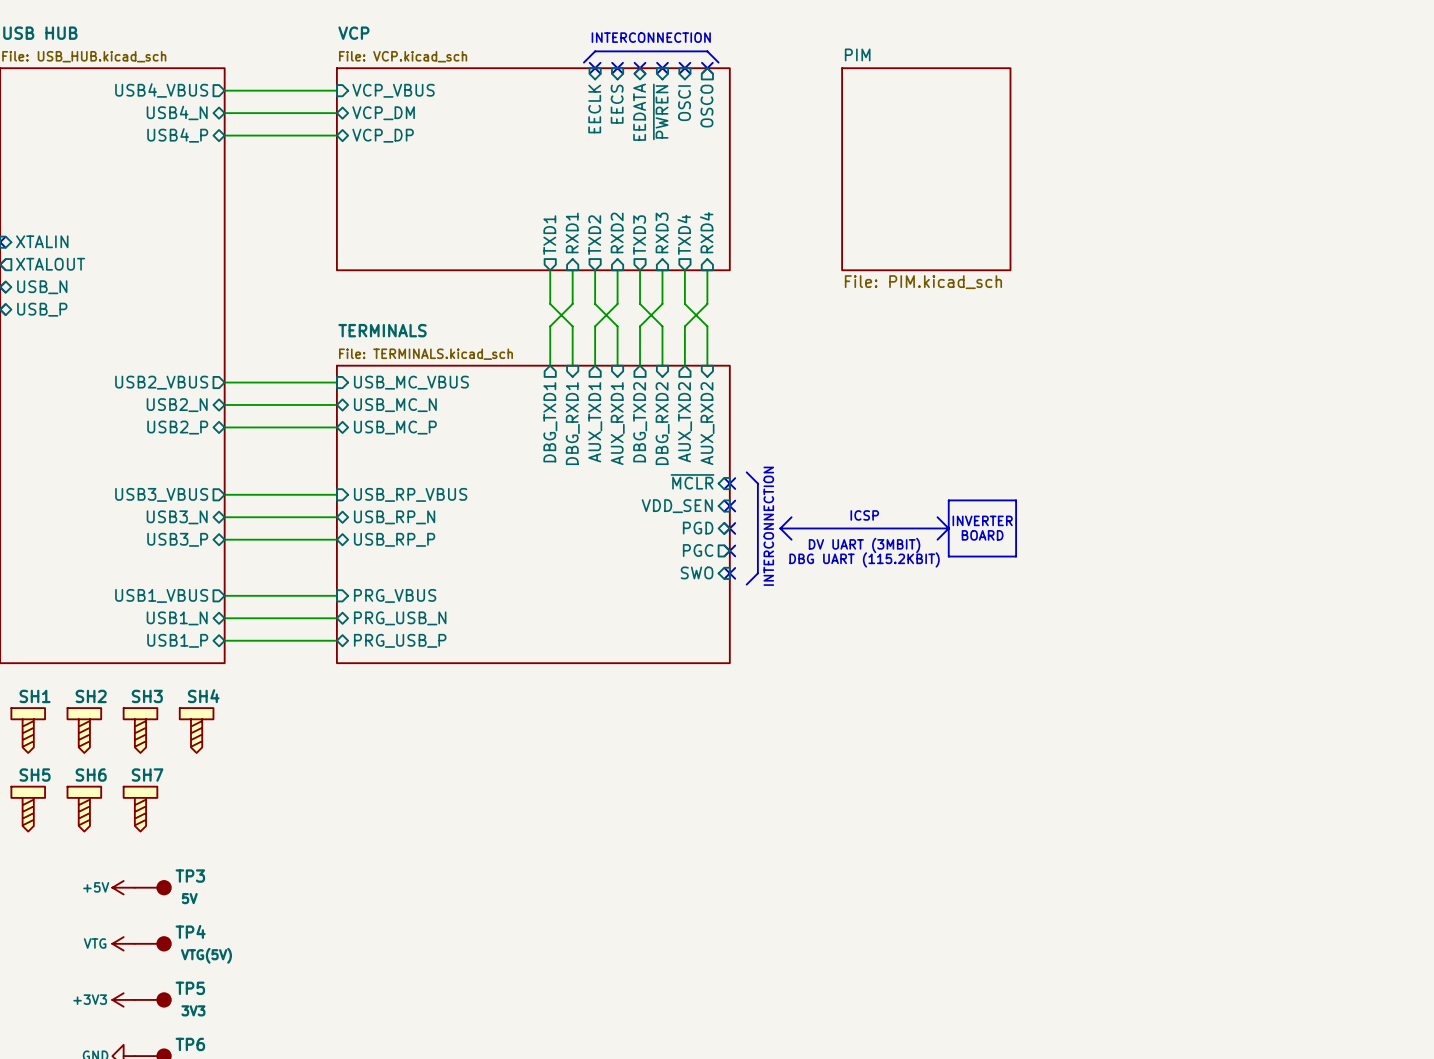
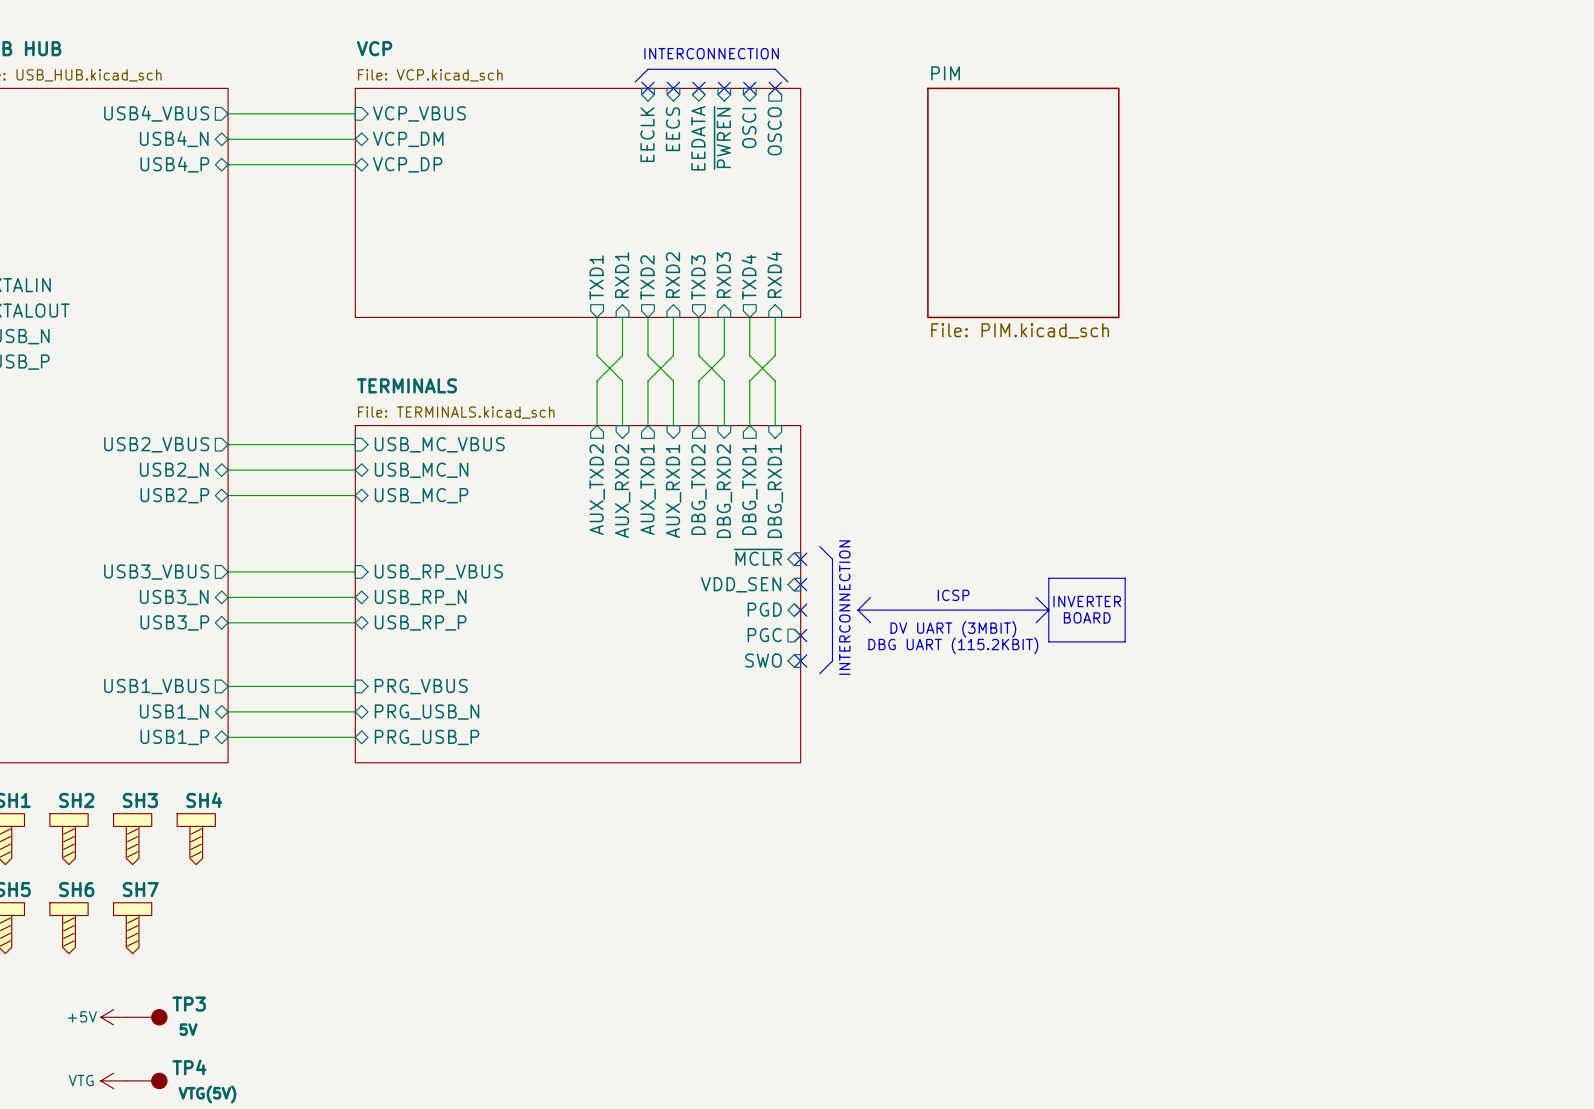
sheet pin: DBG_TXD1 (550, 422) -> AUX_TXD2 (597, 489)
sheet pin: AUX_TXD2 (685, 422) -> DBG_TXD1 (749, 489)
sheet pin: DBG_RXD1 (572, 423) -> AUX_RXD2 (622, 491)
sheet pin: AUX_RXD2 (707, 423) -> DBG_RXD1 (775, 491)

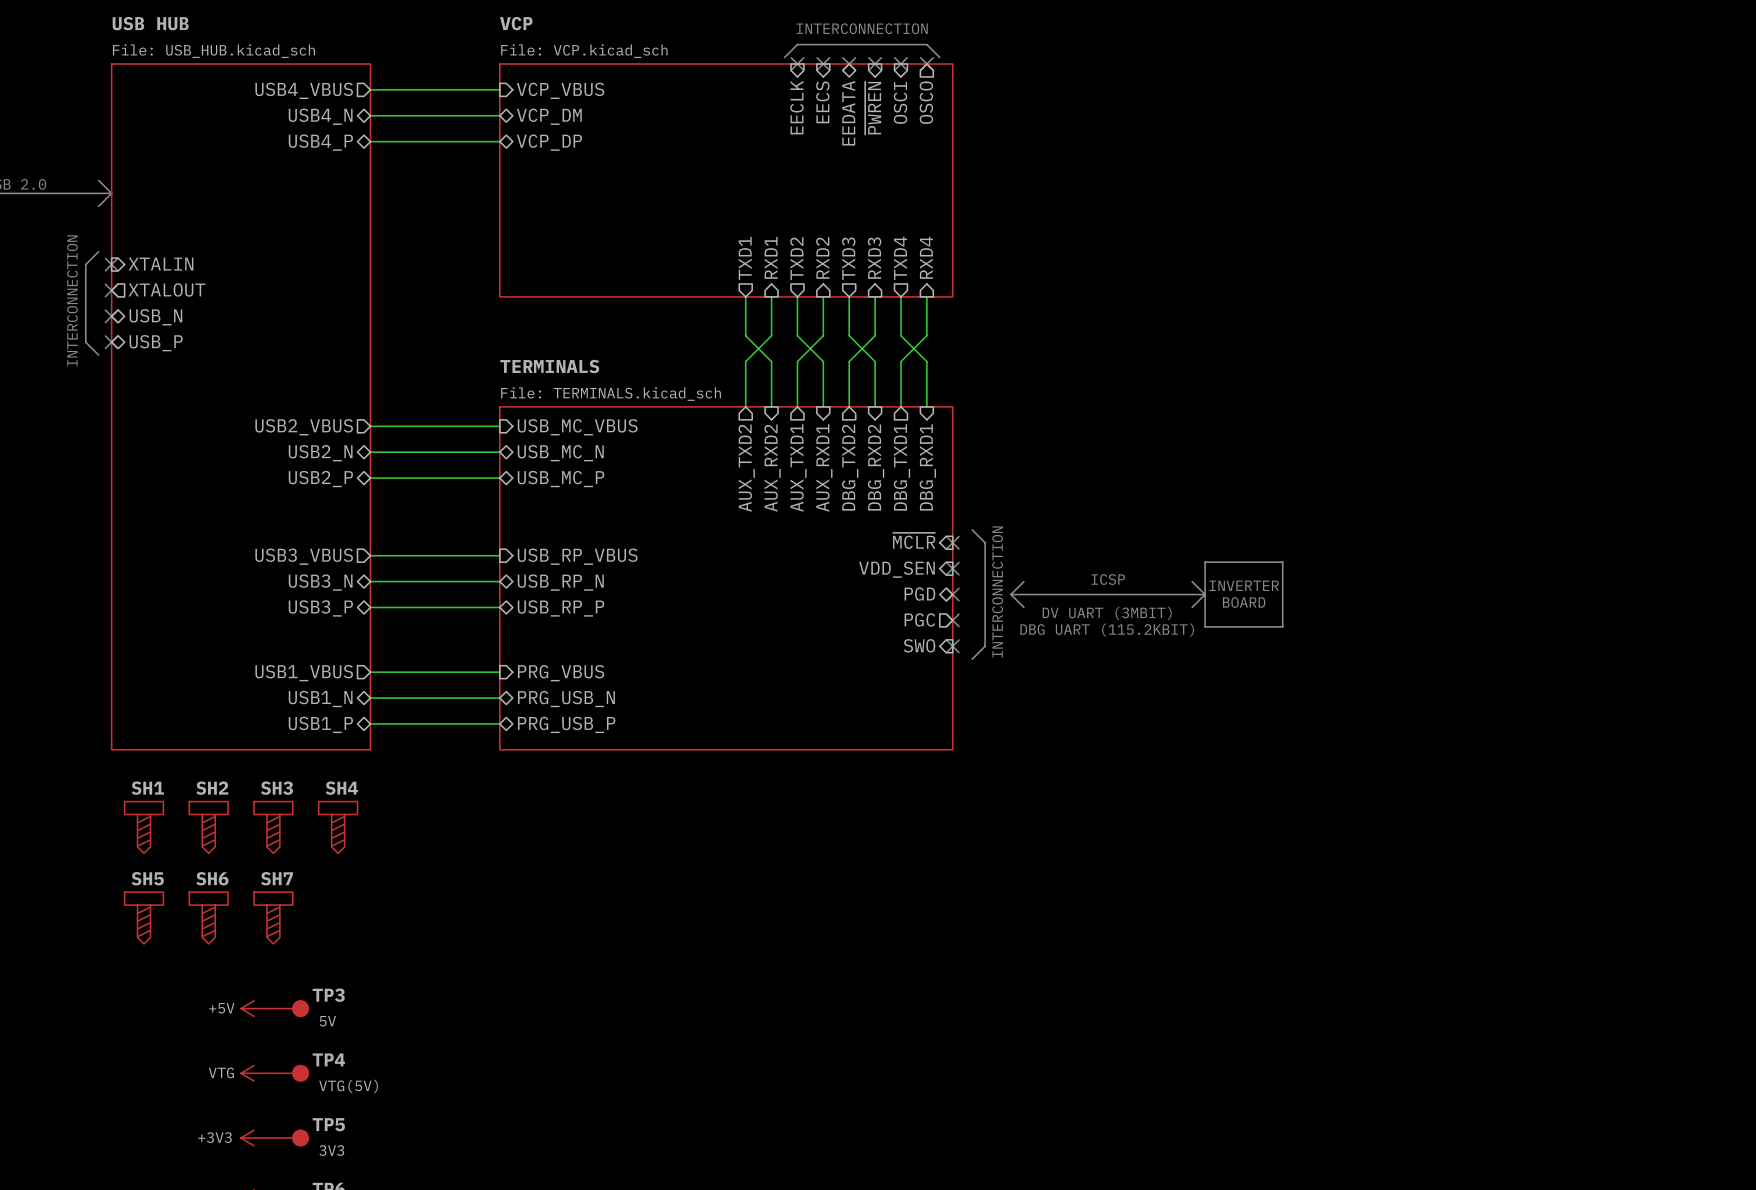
sheet PIM: File: PIM.kicad_sch (1023, 202) -> none

